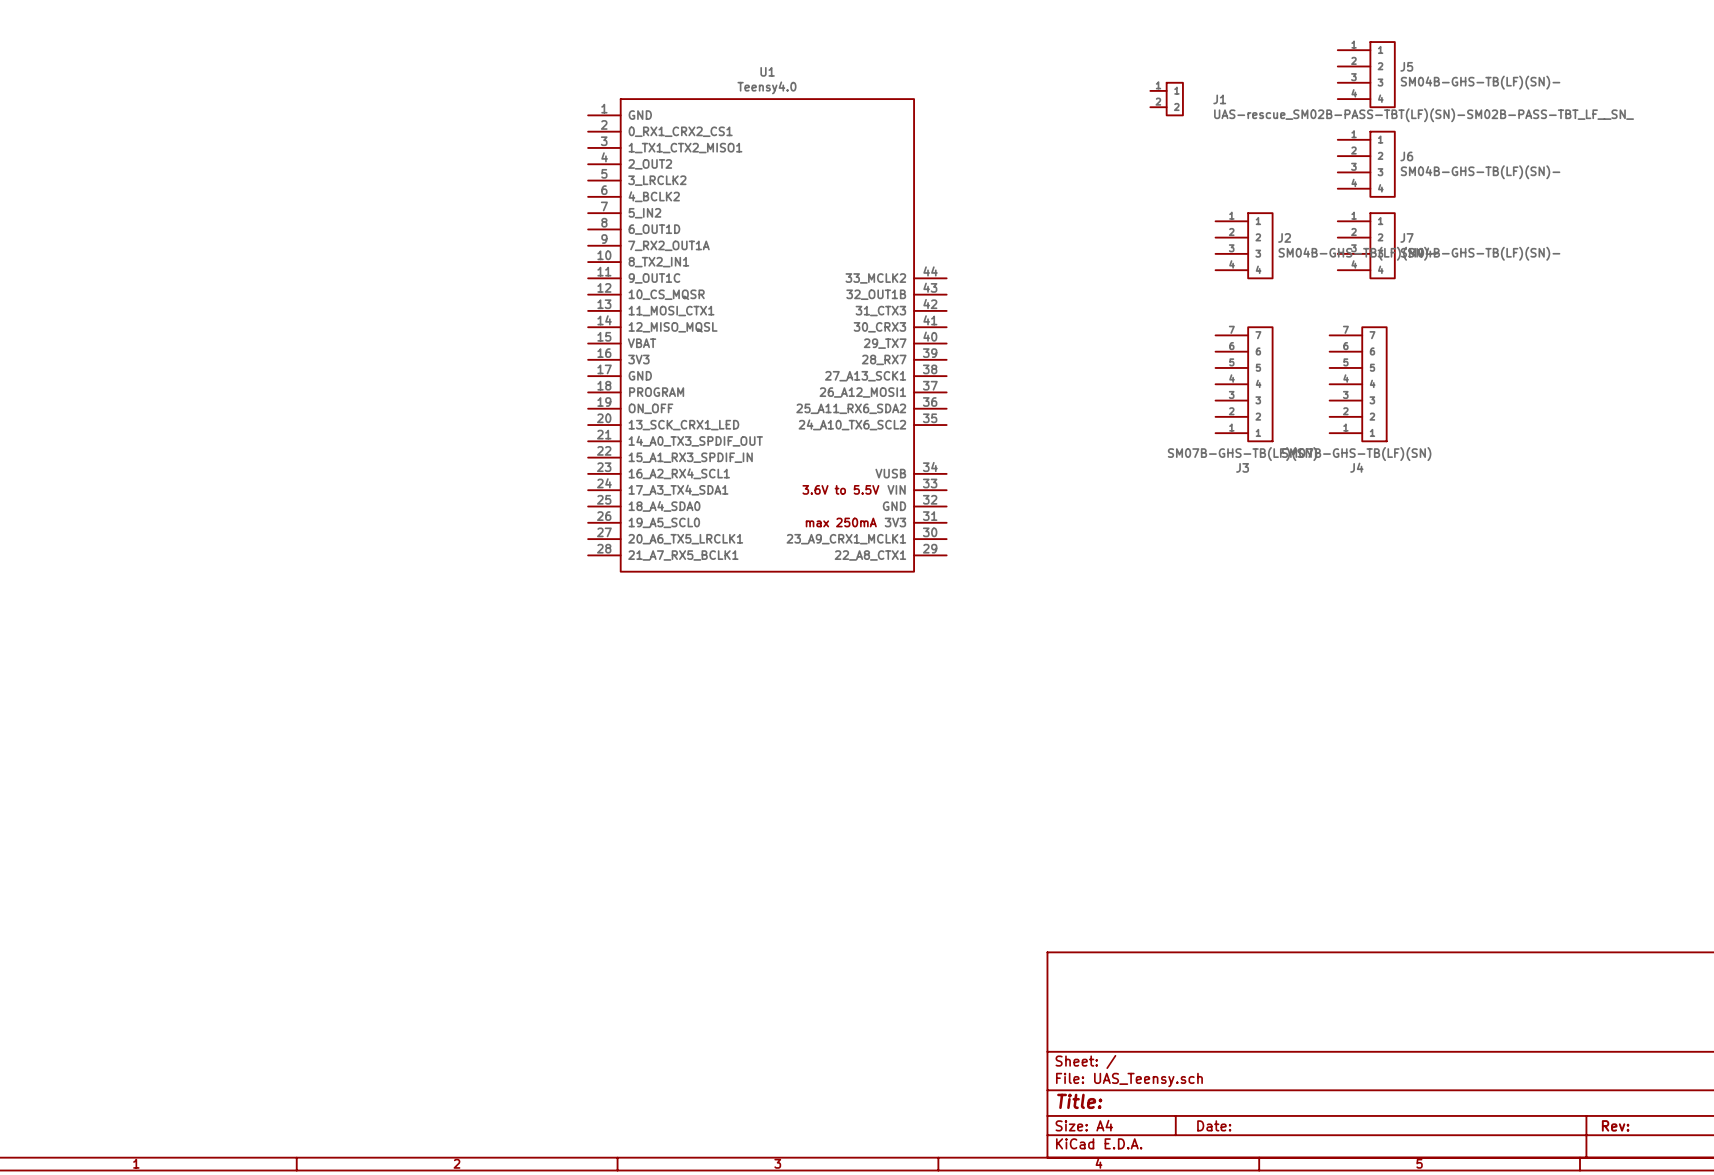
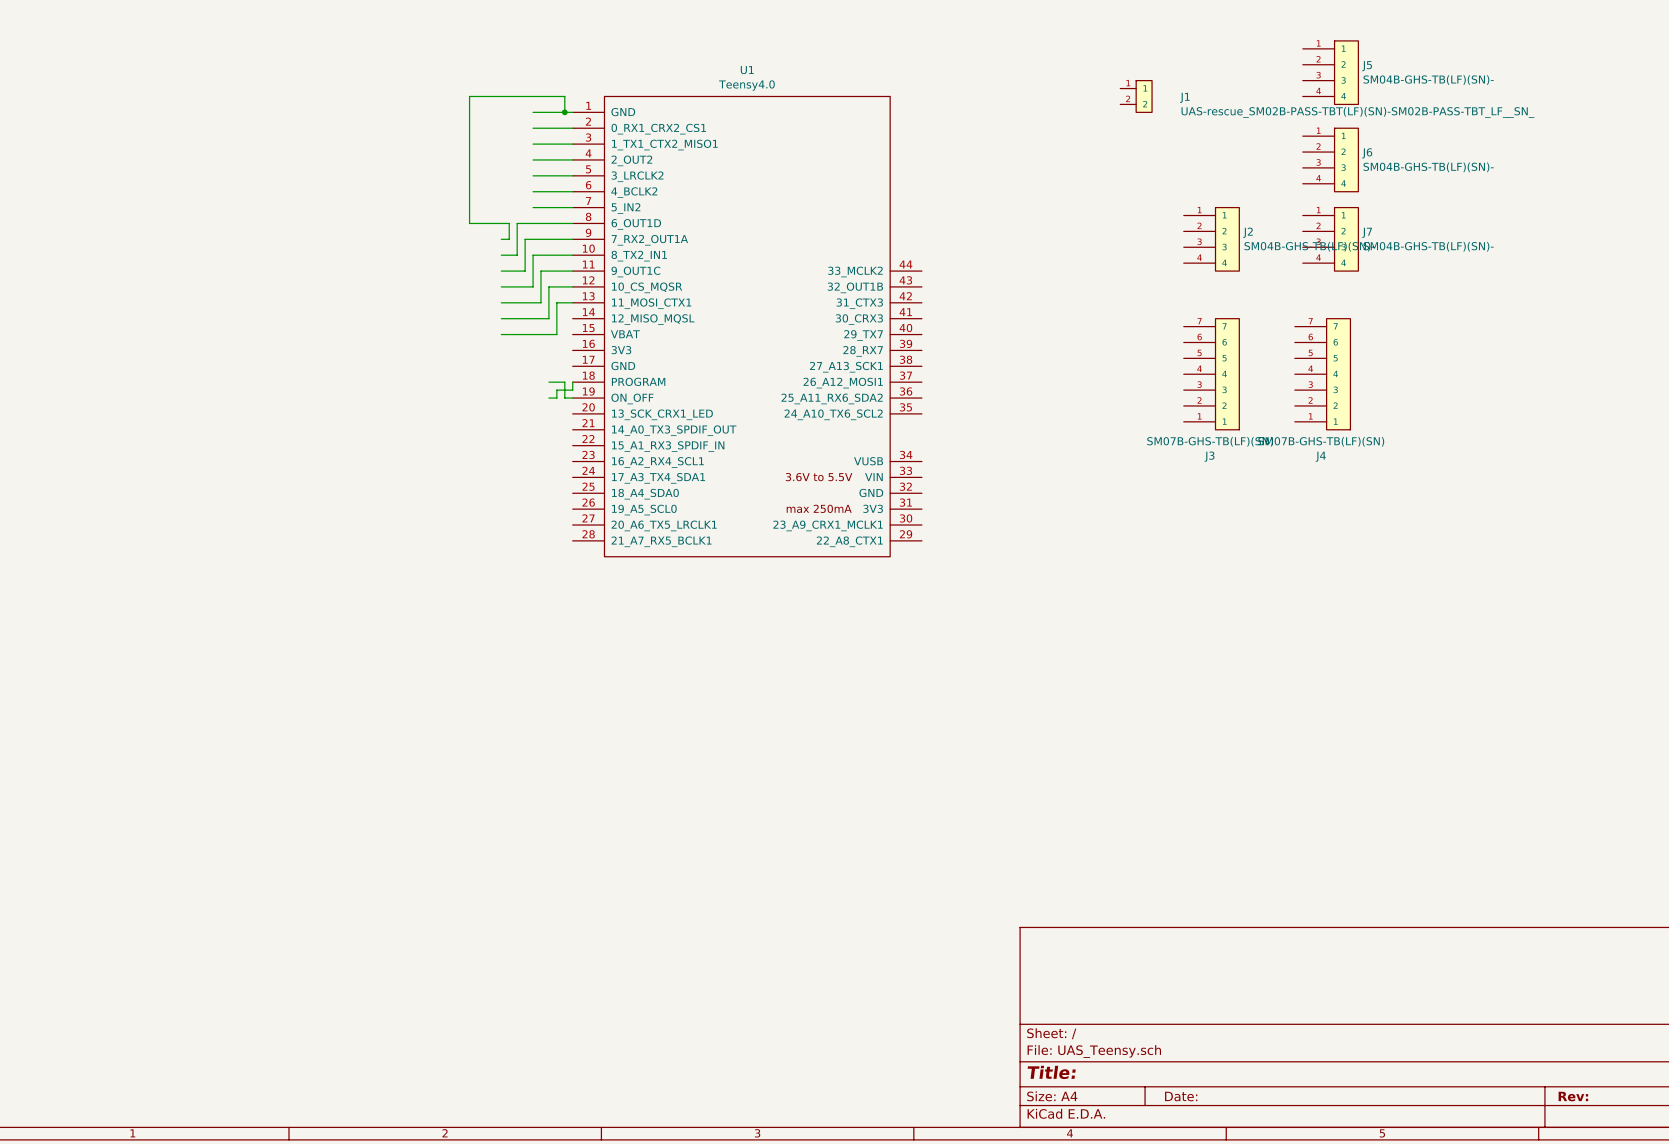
wire: none -> (533, 112) (572, 112)
wire: none -> (564, 112) (564, 96) (469, 96) (469, 223) (509, 223) (509, 239) (501, 239)
junction: none -> (564, 112)
wire: none -> (533, 128) (572, 128)
wire: none -> (533, 144) (572, 144)
wire: none -> (533, 159) (572, 159)
wire: none -> (533, 175) (572, 175)
wire: none -> (533, 191) (572, 191)
wire: none -> (533, 207) (572, 207)
wire: none -> (572, 223) (517, 223) (517, 255) (501, 255)
wire: none -> (572, 239) (525, 239) (525, 271) (501, 271)
wire: none -> (572, 255) (533, 255) (533, 286) (501, 286)
wire: none -> (572, 271) (540, 271) (540, 302) (501, 302)
wire: none -> (572, 286) (548, 286) (548, 318) (501, 318)
wire: none -> (572, 302) (556, 302) (556, 334) (501, 334)
wire: none -> (548, 382) (564, 382) (564, 398) (572, 398)
wire: none -> (572, 382) (572, 390) (556, 390) (556, 398) (548, 398)

